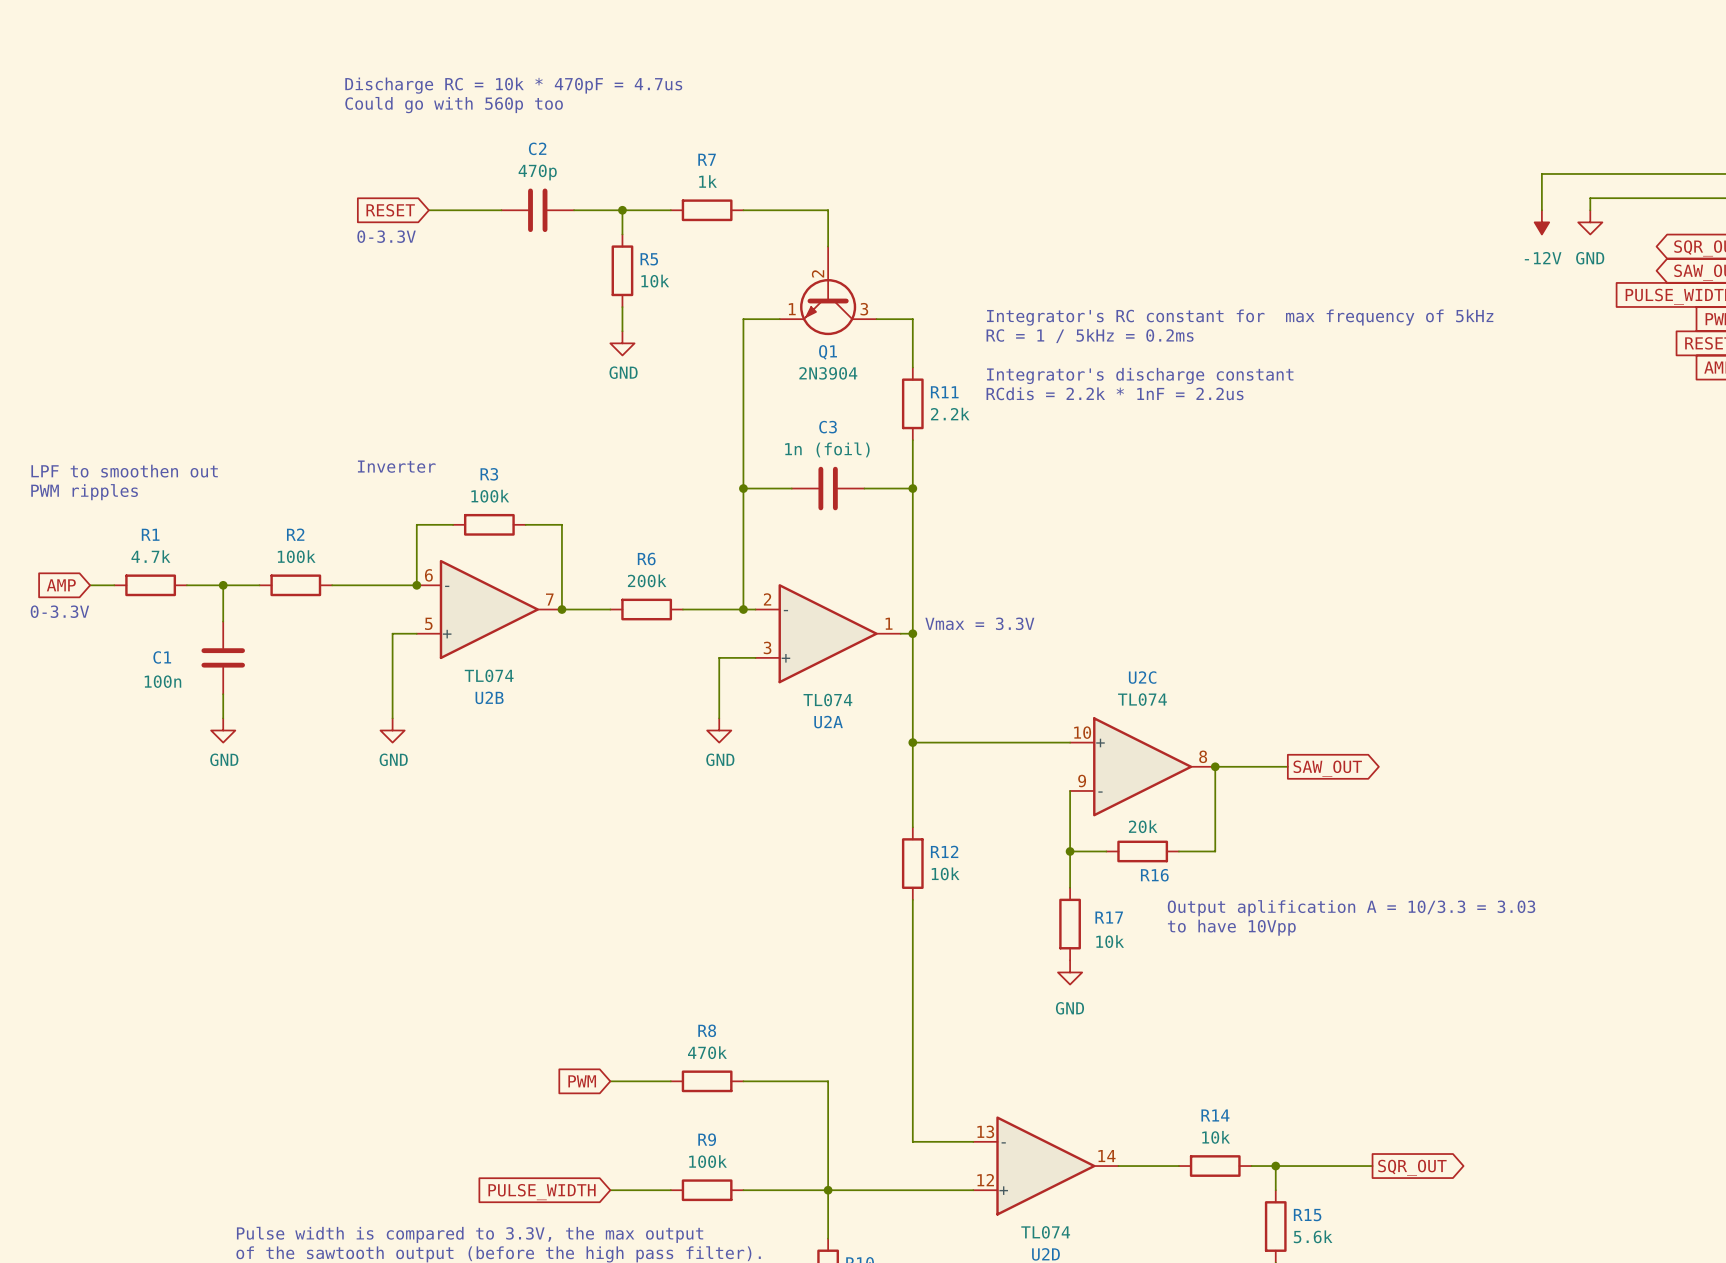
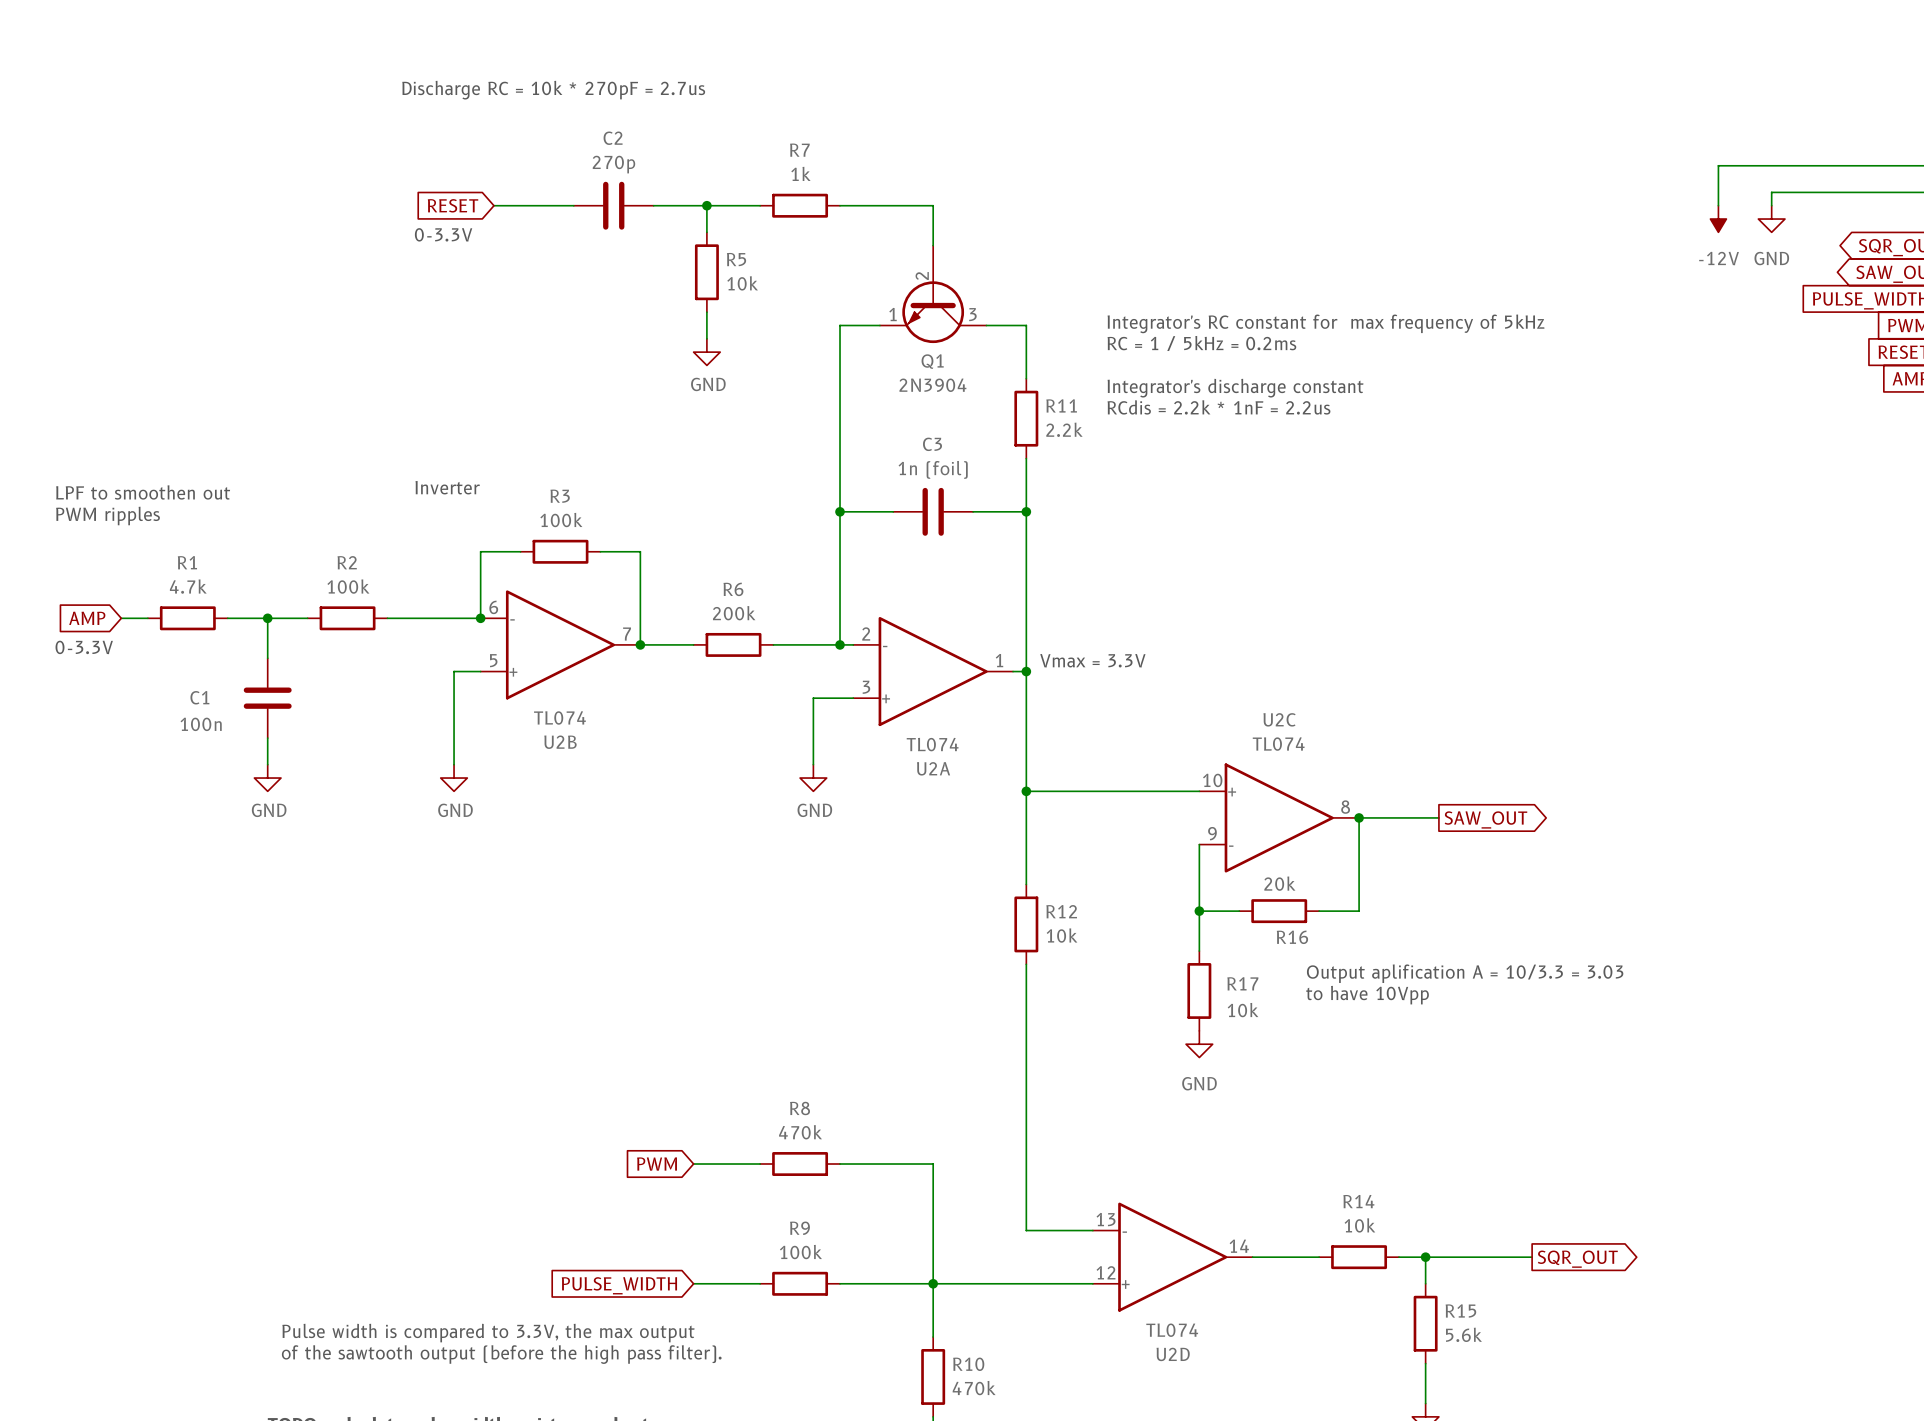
text: Discharge RC = 10k * 470pF = 4.7us (513, 85) -> none
text: Could go with 560p too (454, 105) -> Discharge RC = 10k * 270pF = 2.7us (553, 90)
C2 value: 470p (537, 172) -> 270p (613, 164)

